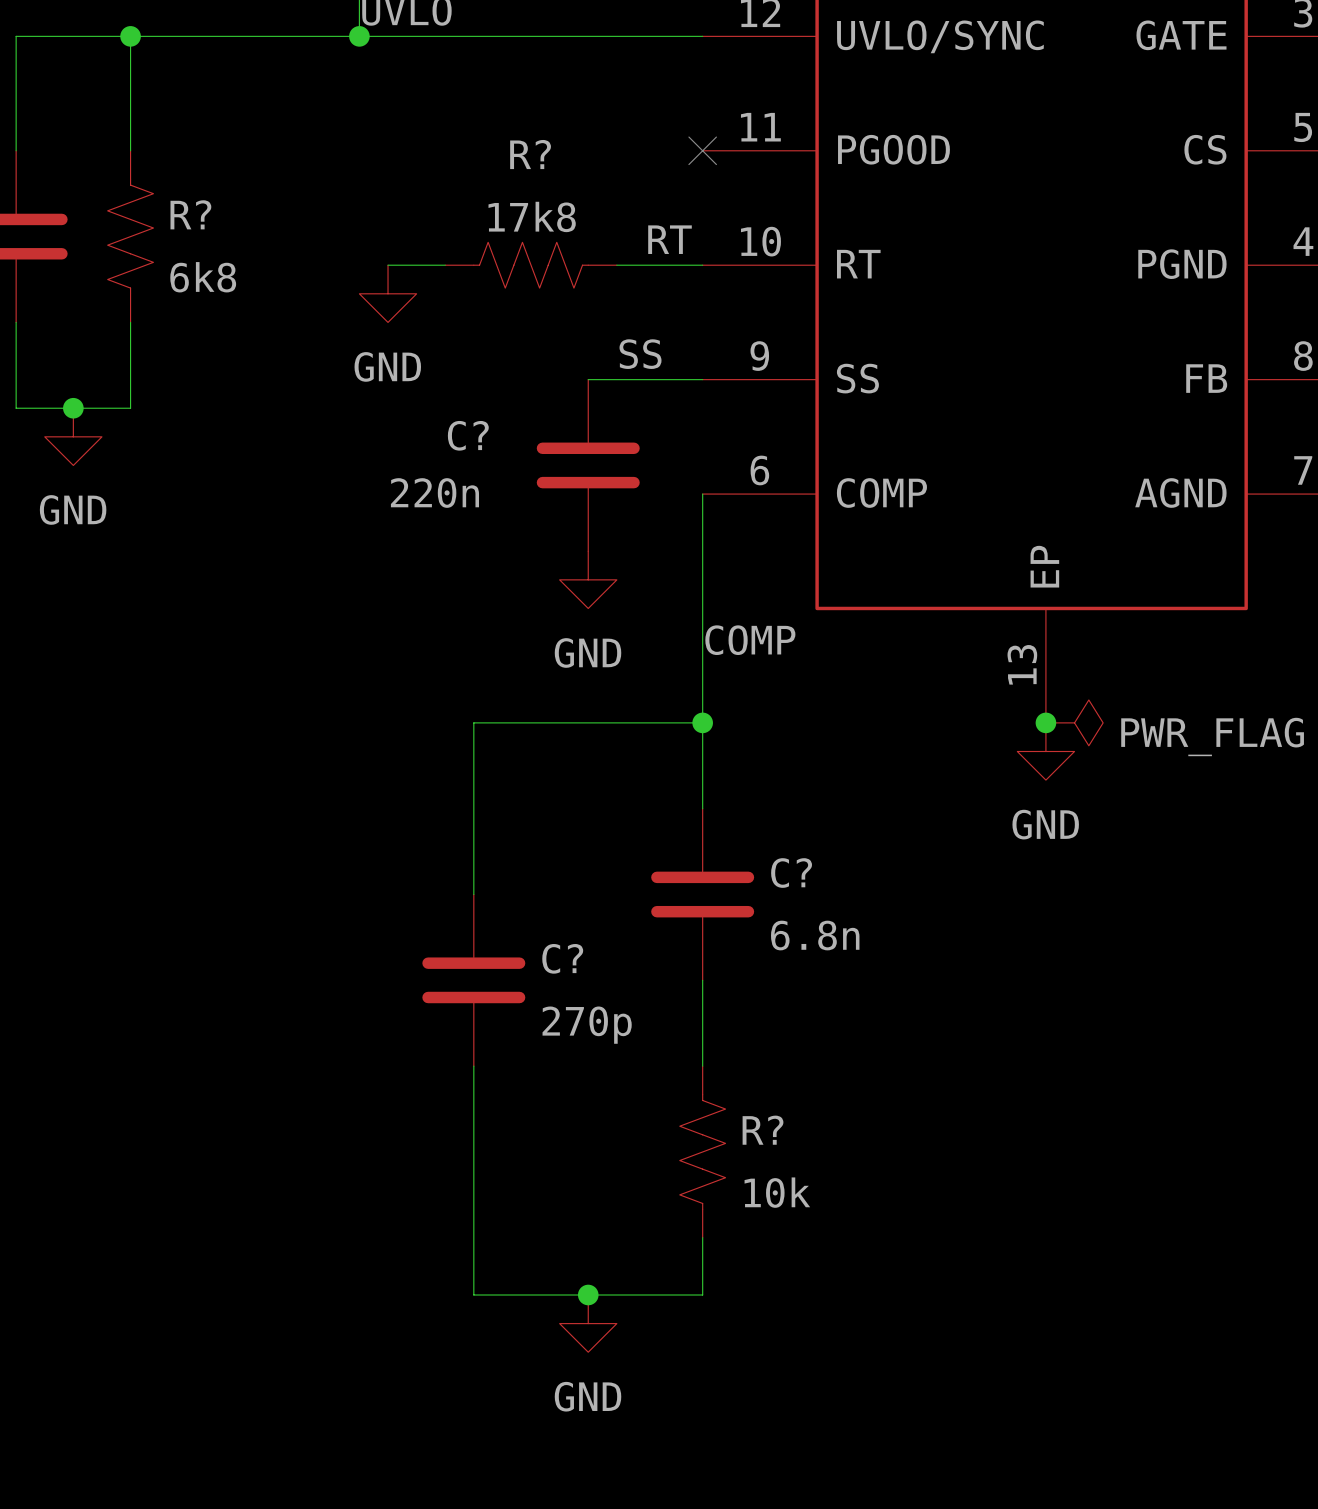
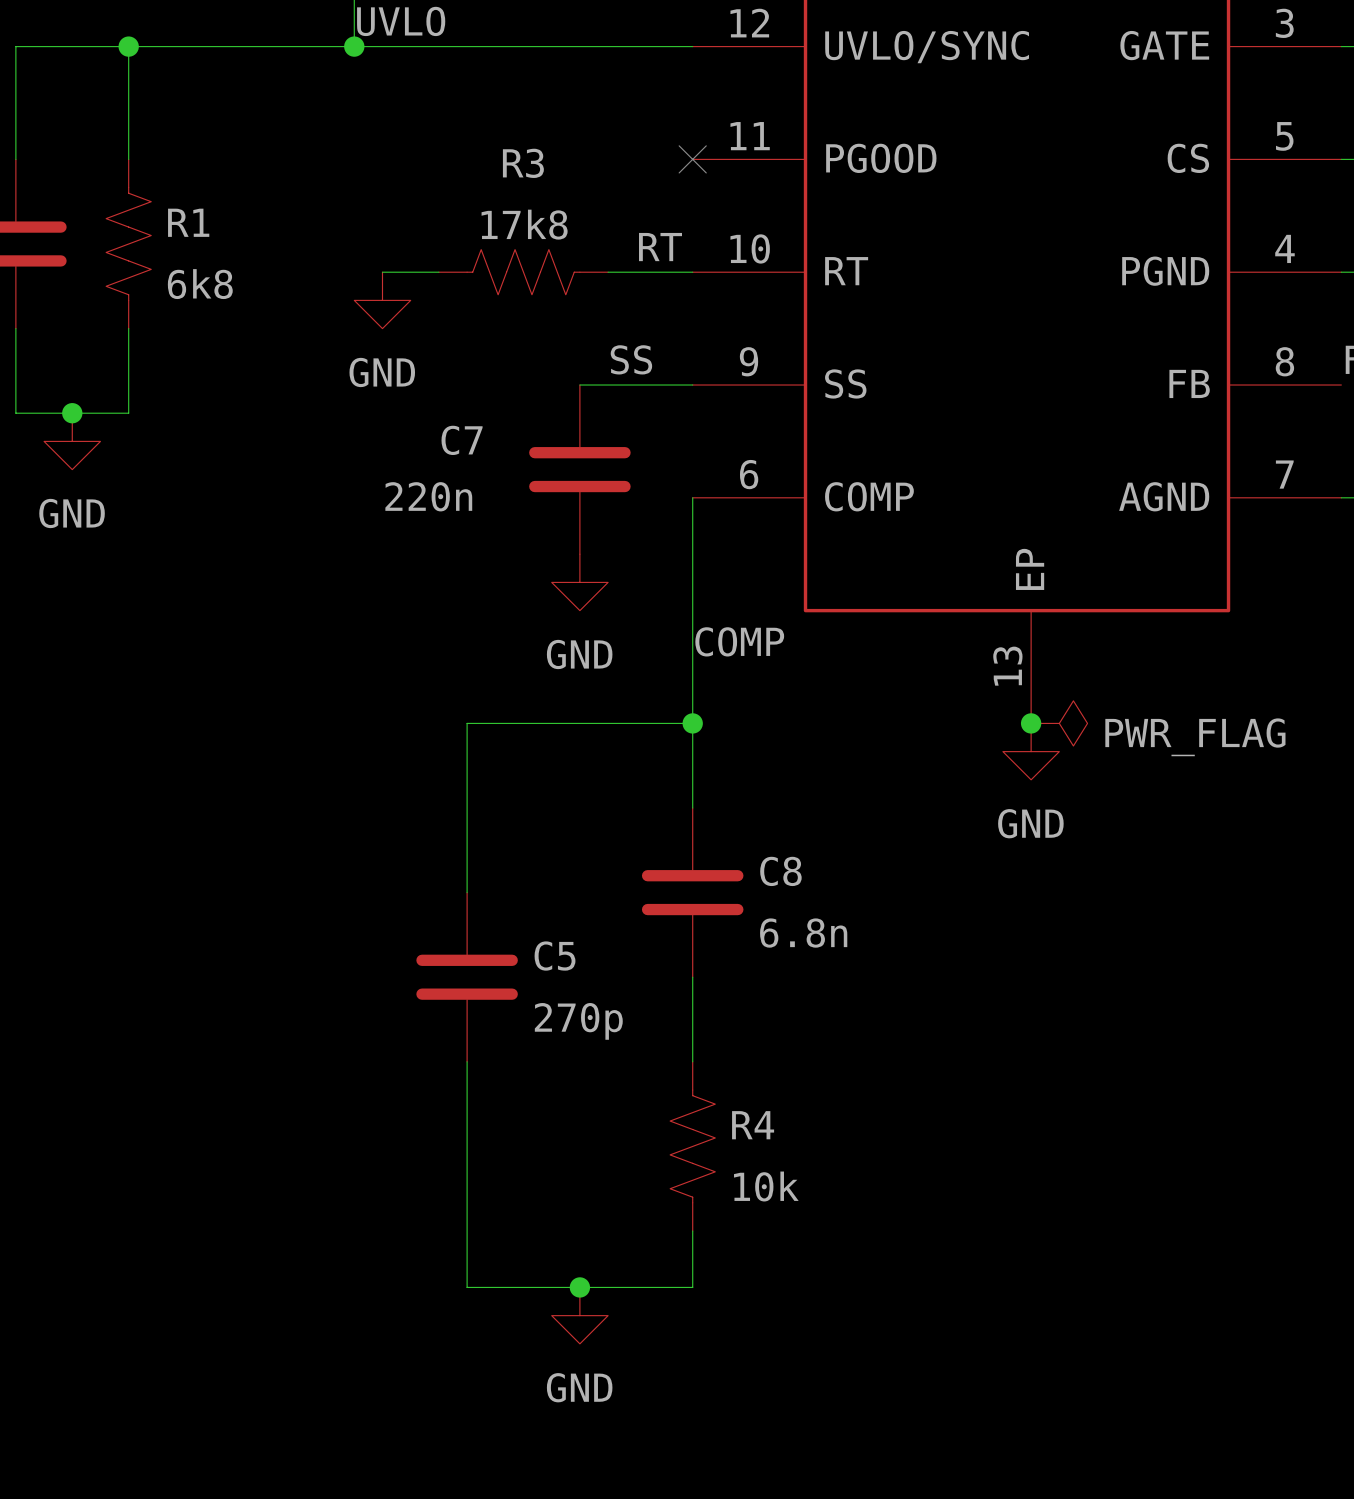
R? name: R? (530, 154) -> R3 (523, 163)
R? name: R? (190, 214) -> R1 (188, 222)
C? name: C? (468, 435) -> C7 (462, 440)
C? name: C? (791, 873) -> C8 (780, 871)
C? name: C? (562, 958) -> C5 (555, 956)
R? name: R? (763, 1130) -> R4 (753, 1125)

